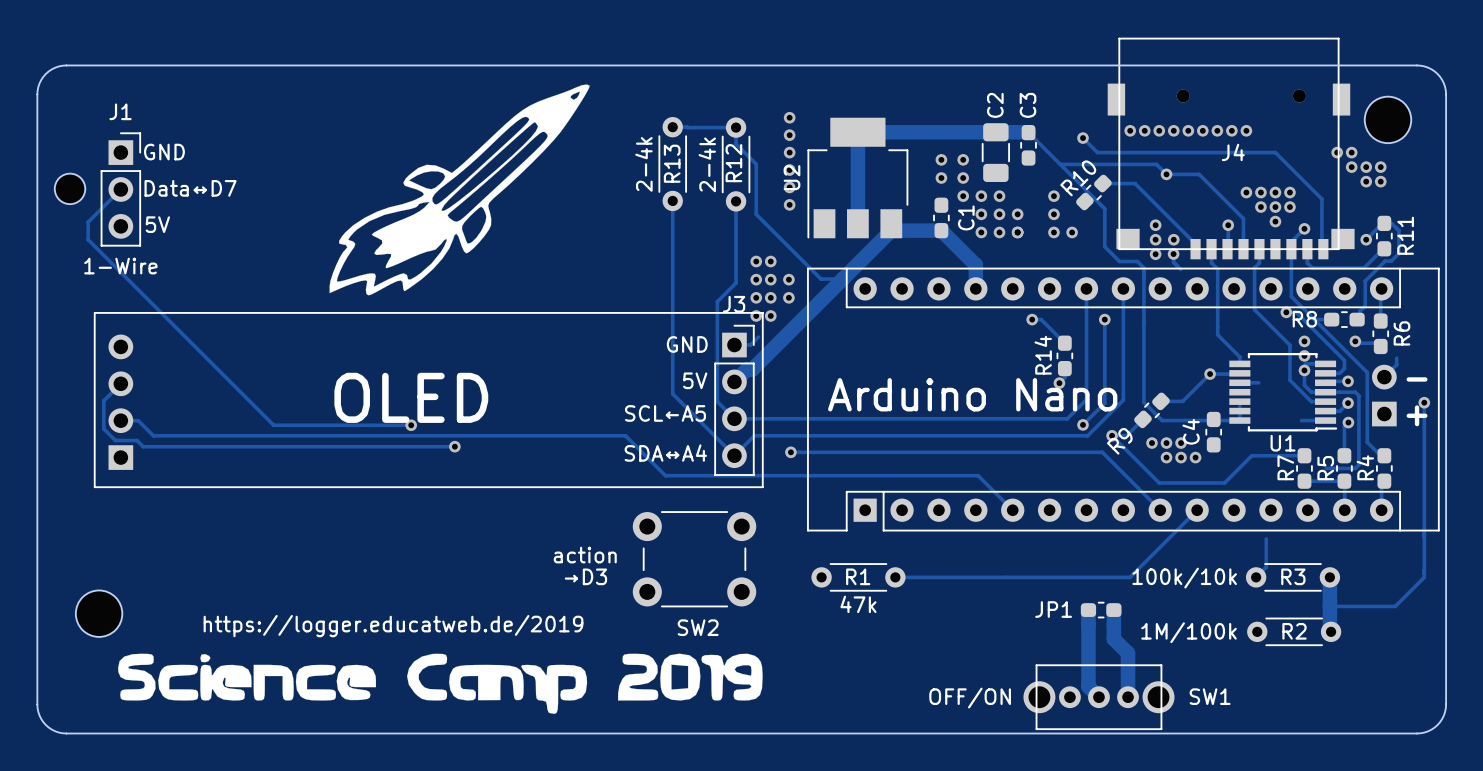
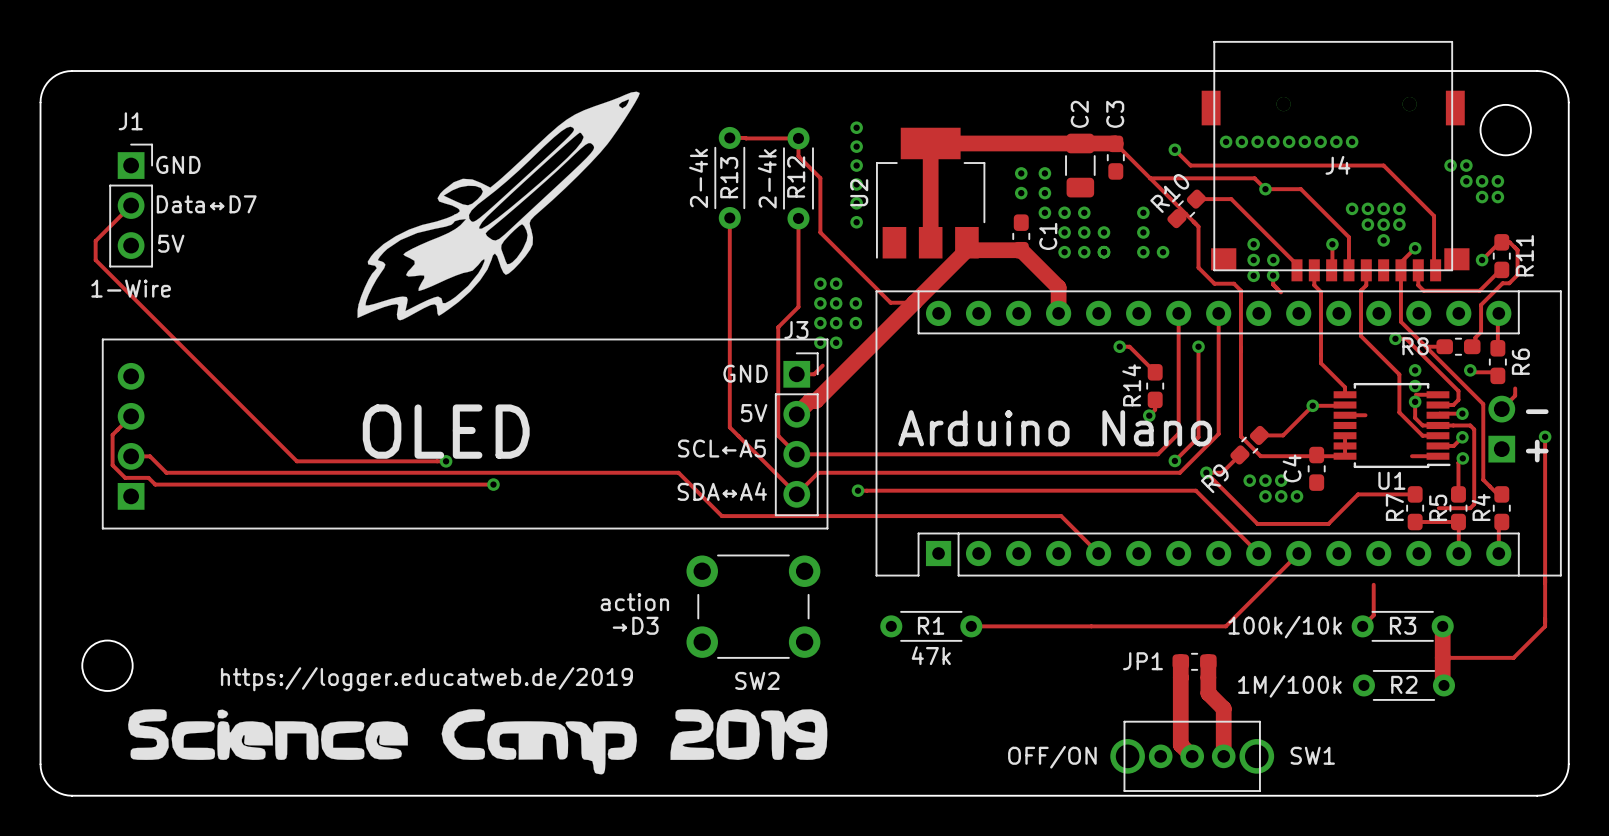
part: (70, 188) -> none

